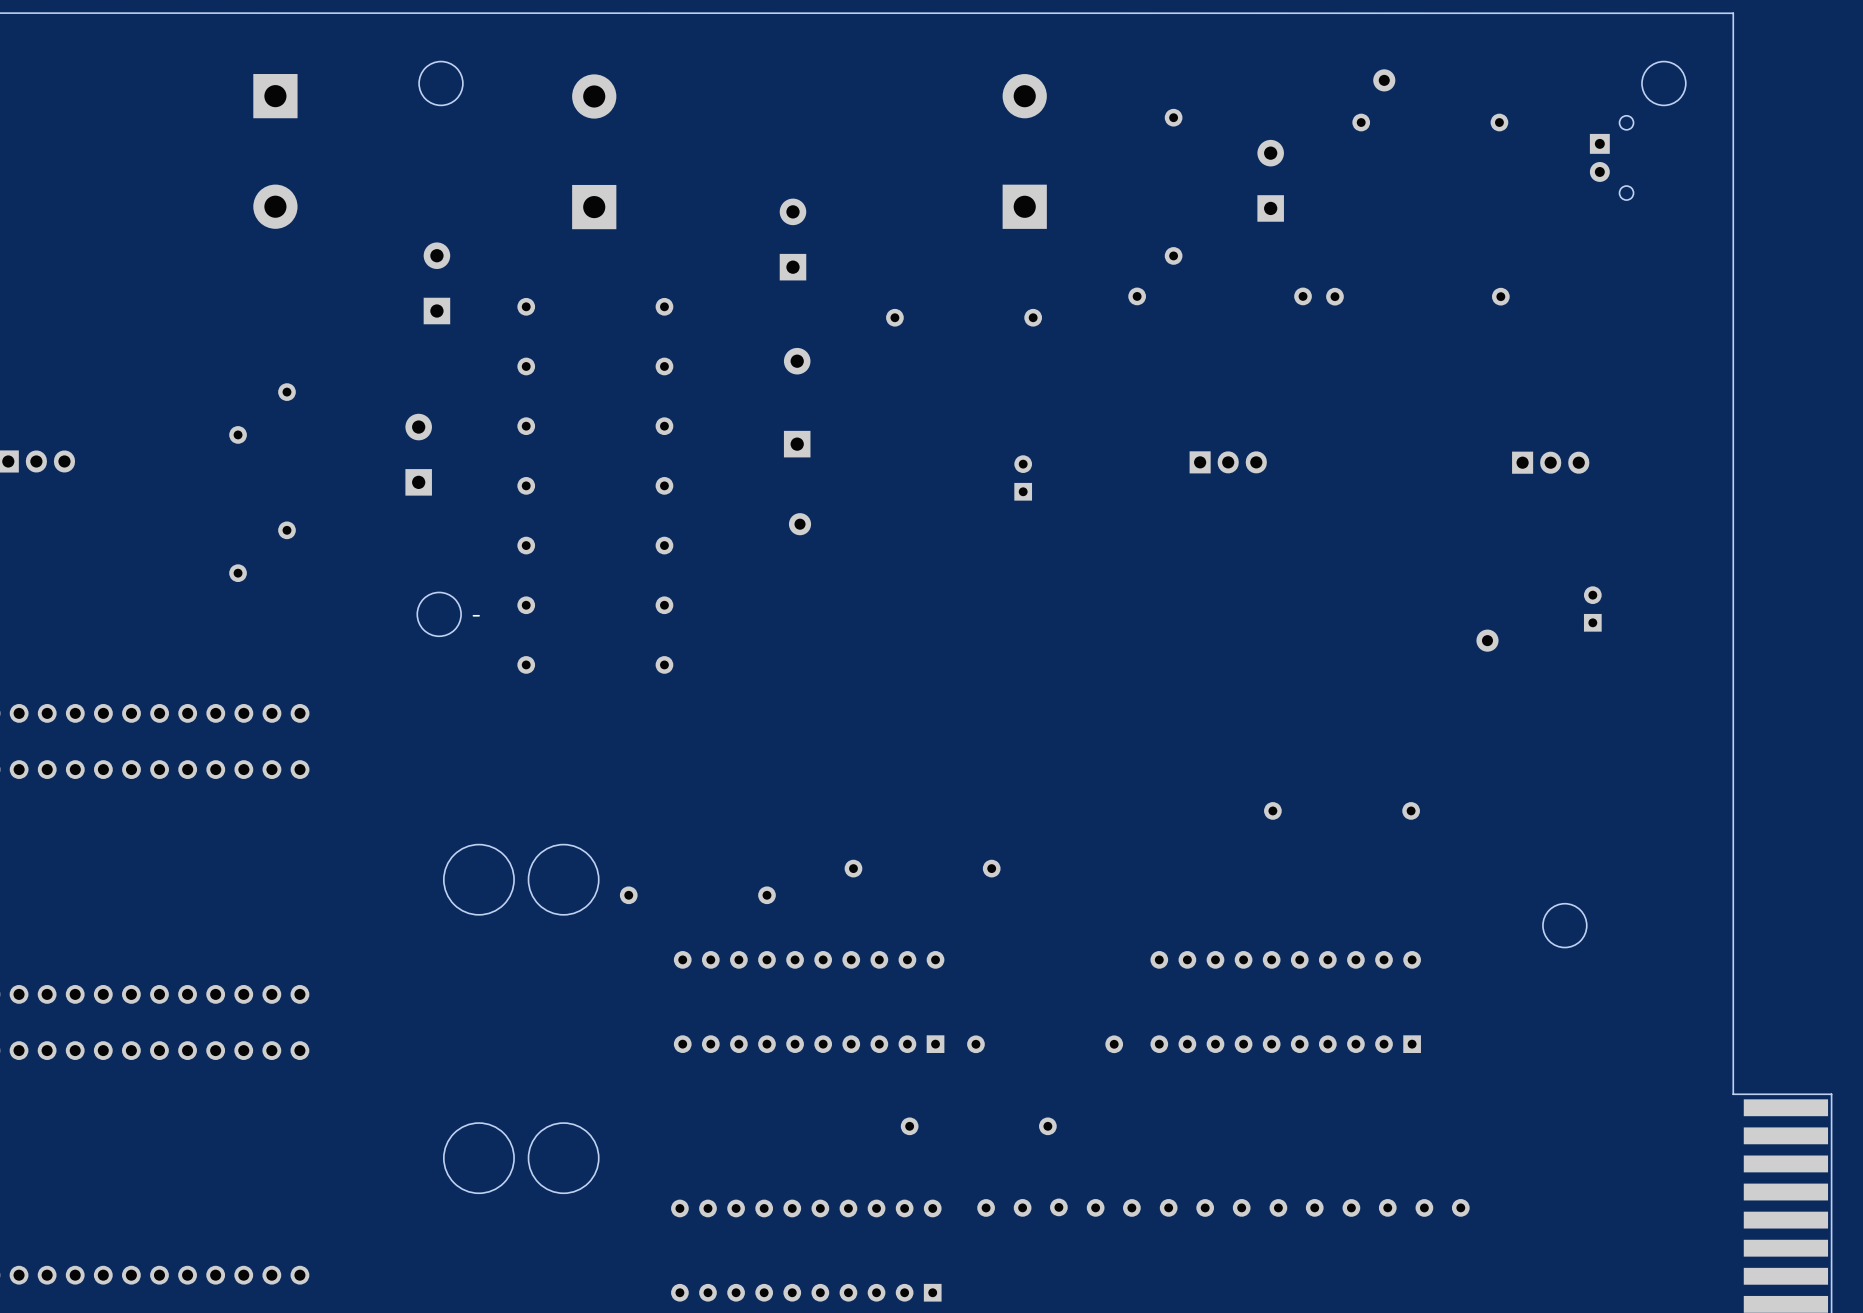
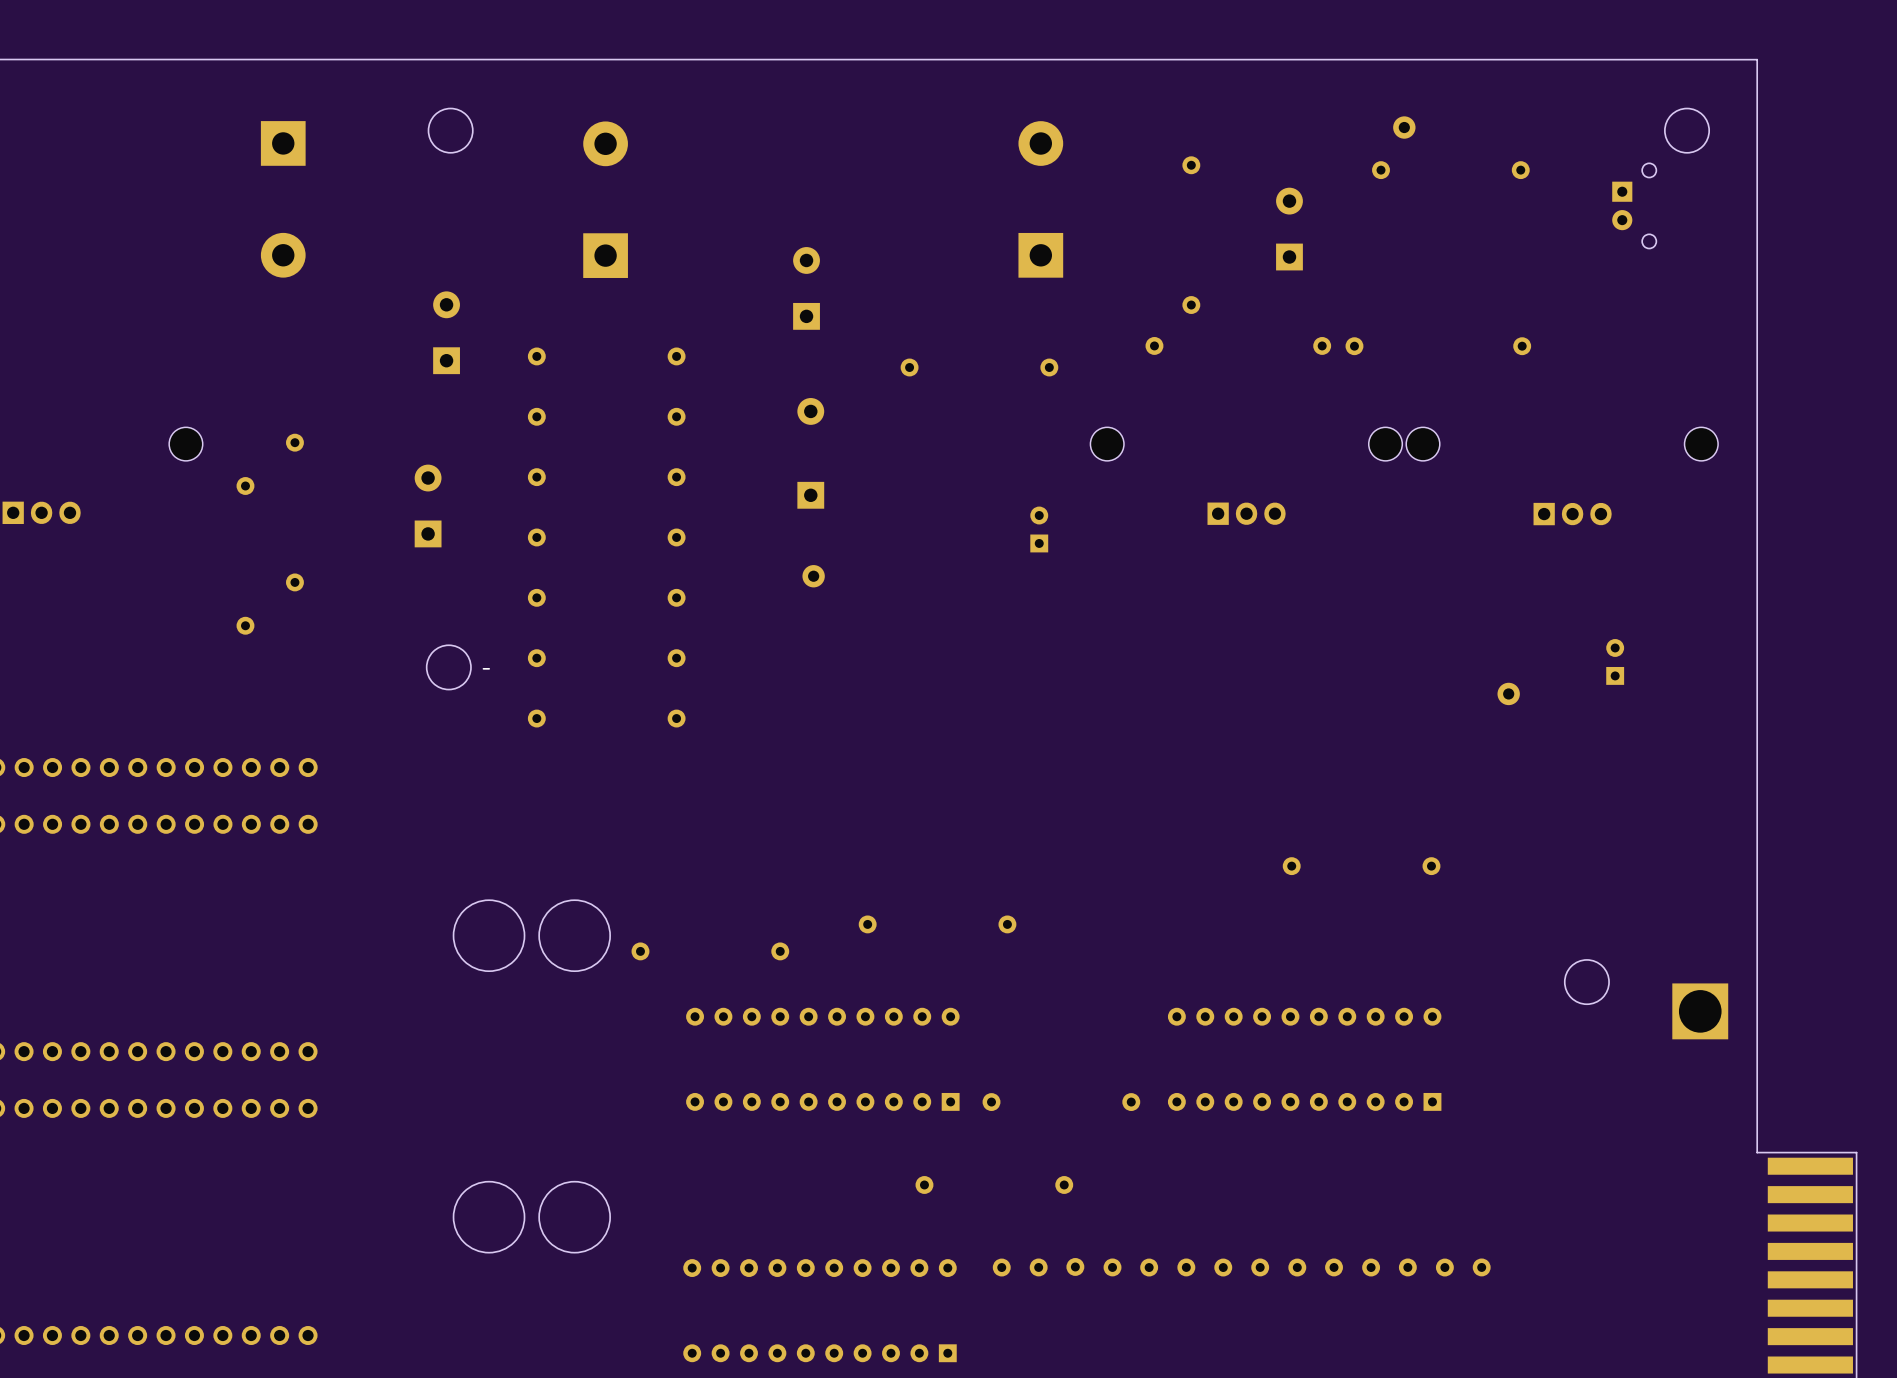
part: none -> (185, 444)
part: none -> (1107, 444)
part: none -> (1385, 444)
part: none -> (1423, 444)
part: none -> (1701, 444)
part: none -> (1700, 1011)

